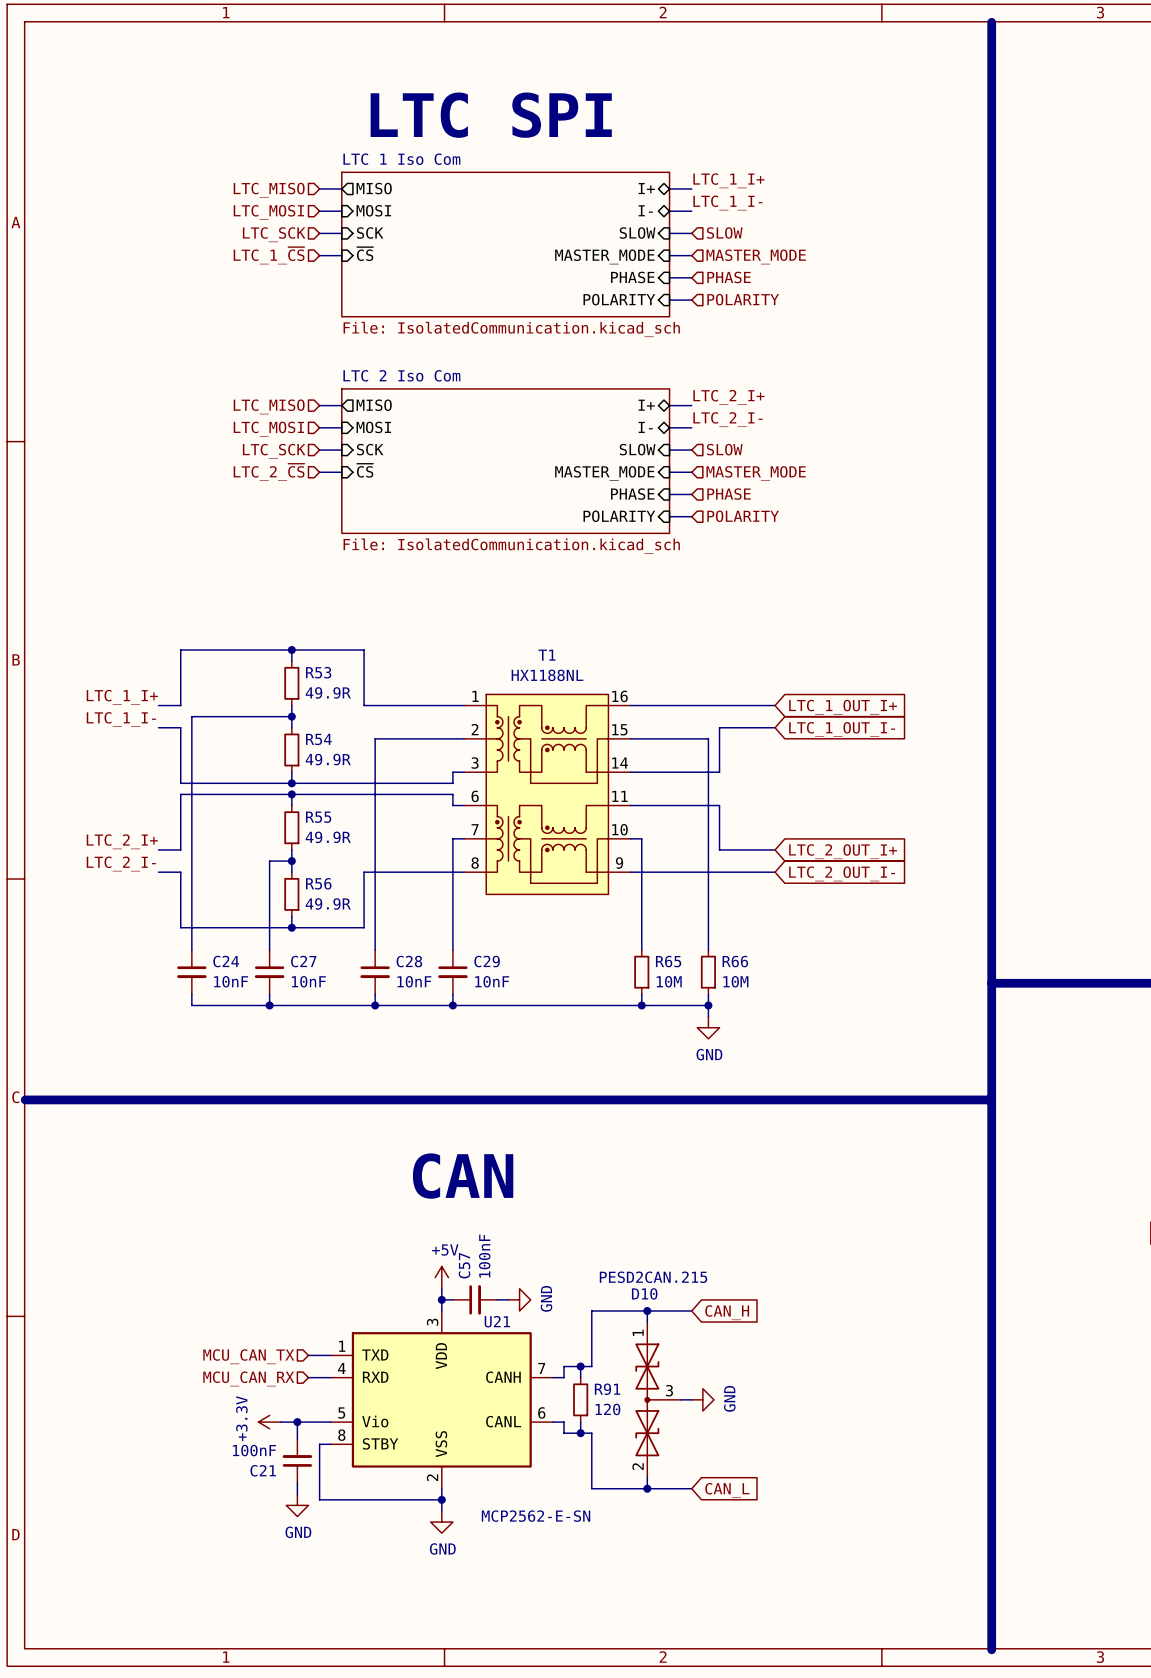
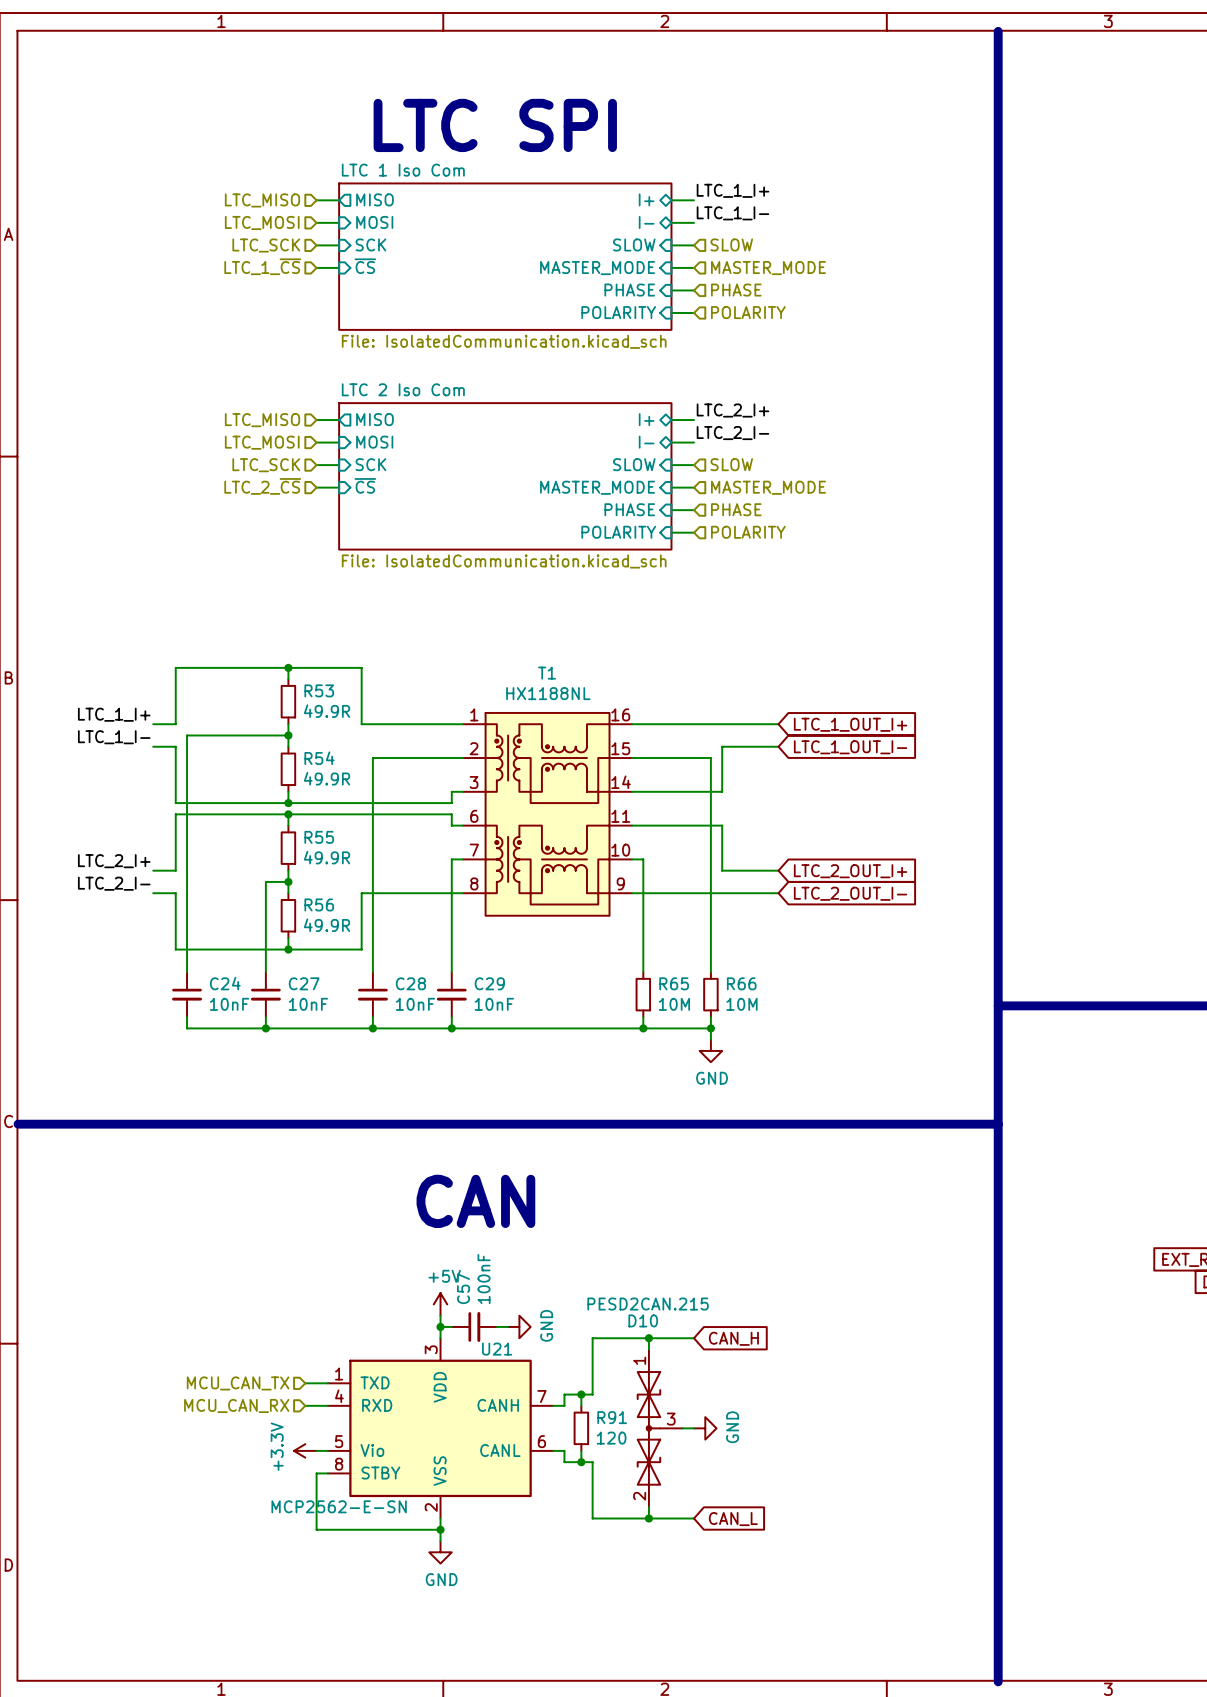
power symbol position: +3.3V (269, 1422) -> +3.3V (305, 1450)
wire: (297, 1422) (297, 1438) -> none
junction: (297, 1422) -> none
C21: 100nF (297, 1460) -> none
wire: (297, 1483) (297, 1494) -> none
power symbol: GND (297, 1505) -> none
U21 value position: MCP2562-E-SN (536, 1516) -> MCP2562-E-SN (339, 1506)

